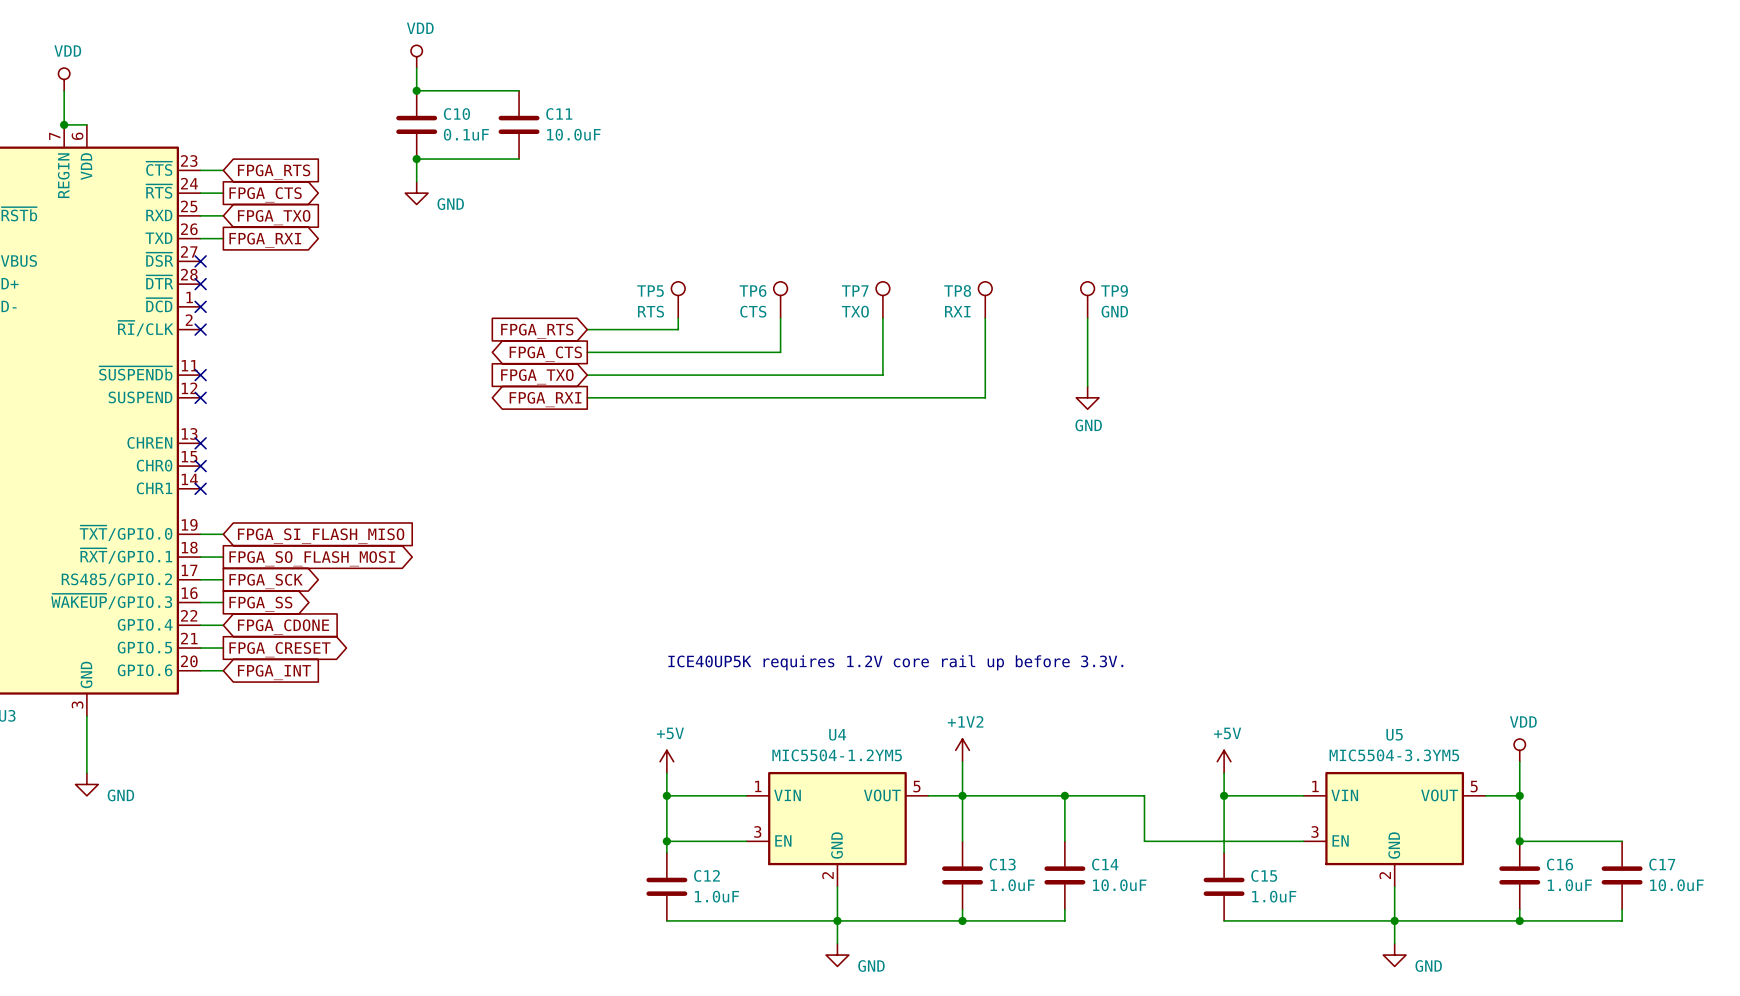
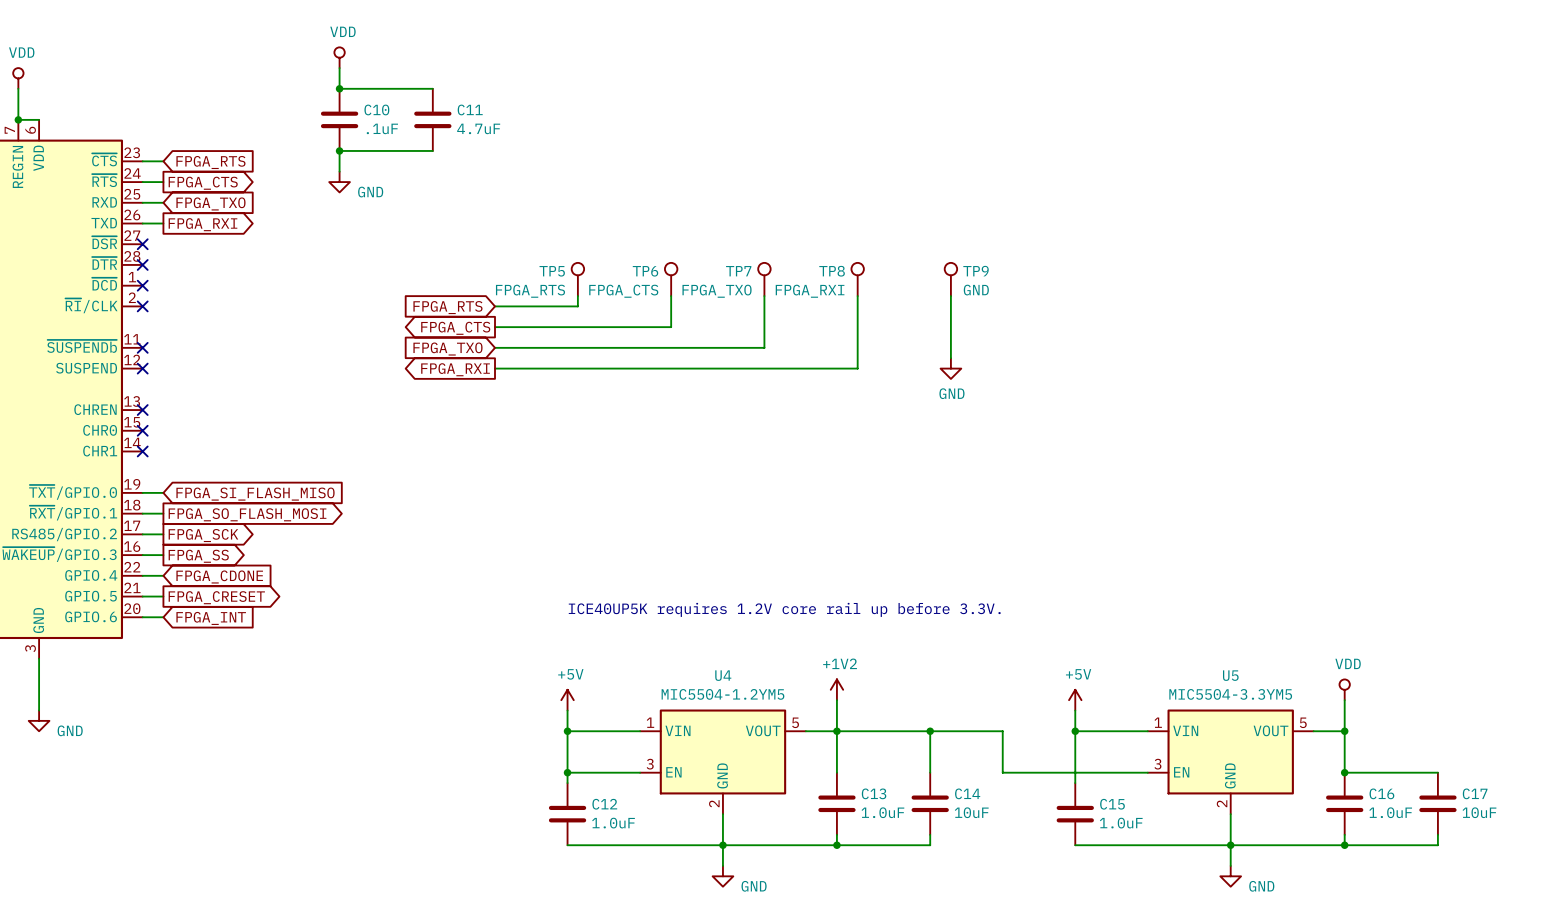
C10 value: 0.1uF (466, 134) -> .1uF (382, 128)
C11 value: 10.0uF (573, 134) -> 4.7uF (478, 128)
TP5 value: RTS (650, 311) -> FPGA_RTS (530, 291)
TP6 value: CTS (753, 311) -> FPGA_CTS (623, 291)
TP7 value: TXO (855, 311) -> FPGA_TXO (717, 291)
TP8 value: RXI (957, 311) -> FPGA_RXI (810, 291)
C14 value: 10.0uF (1119, 885) -> 10uF (971, 812)
C17 value: 10.0uF (1676, 885) -> 10uF (1479, 812)

